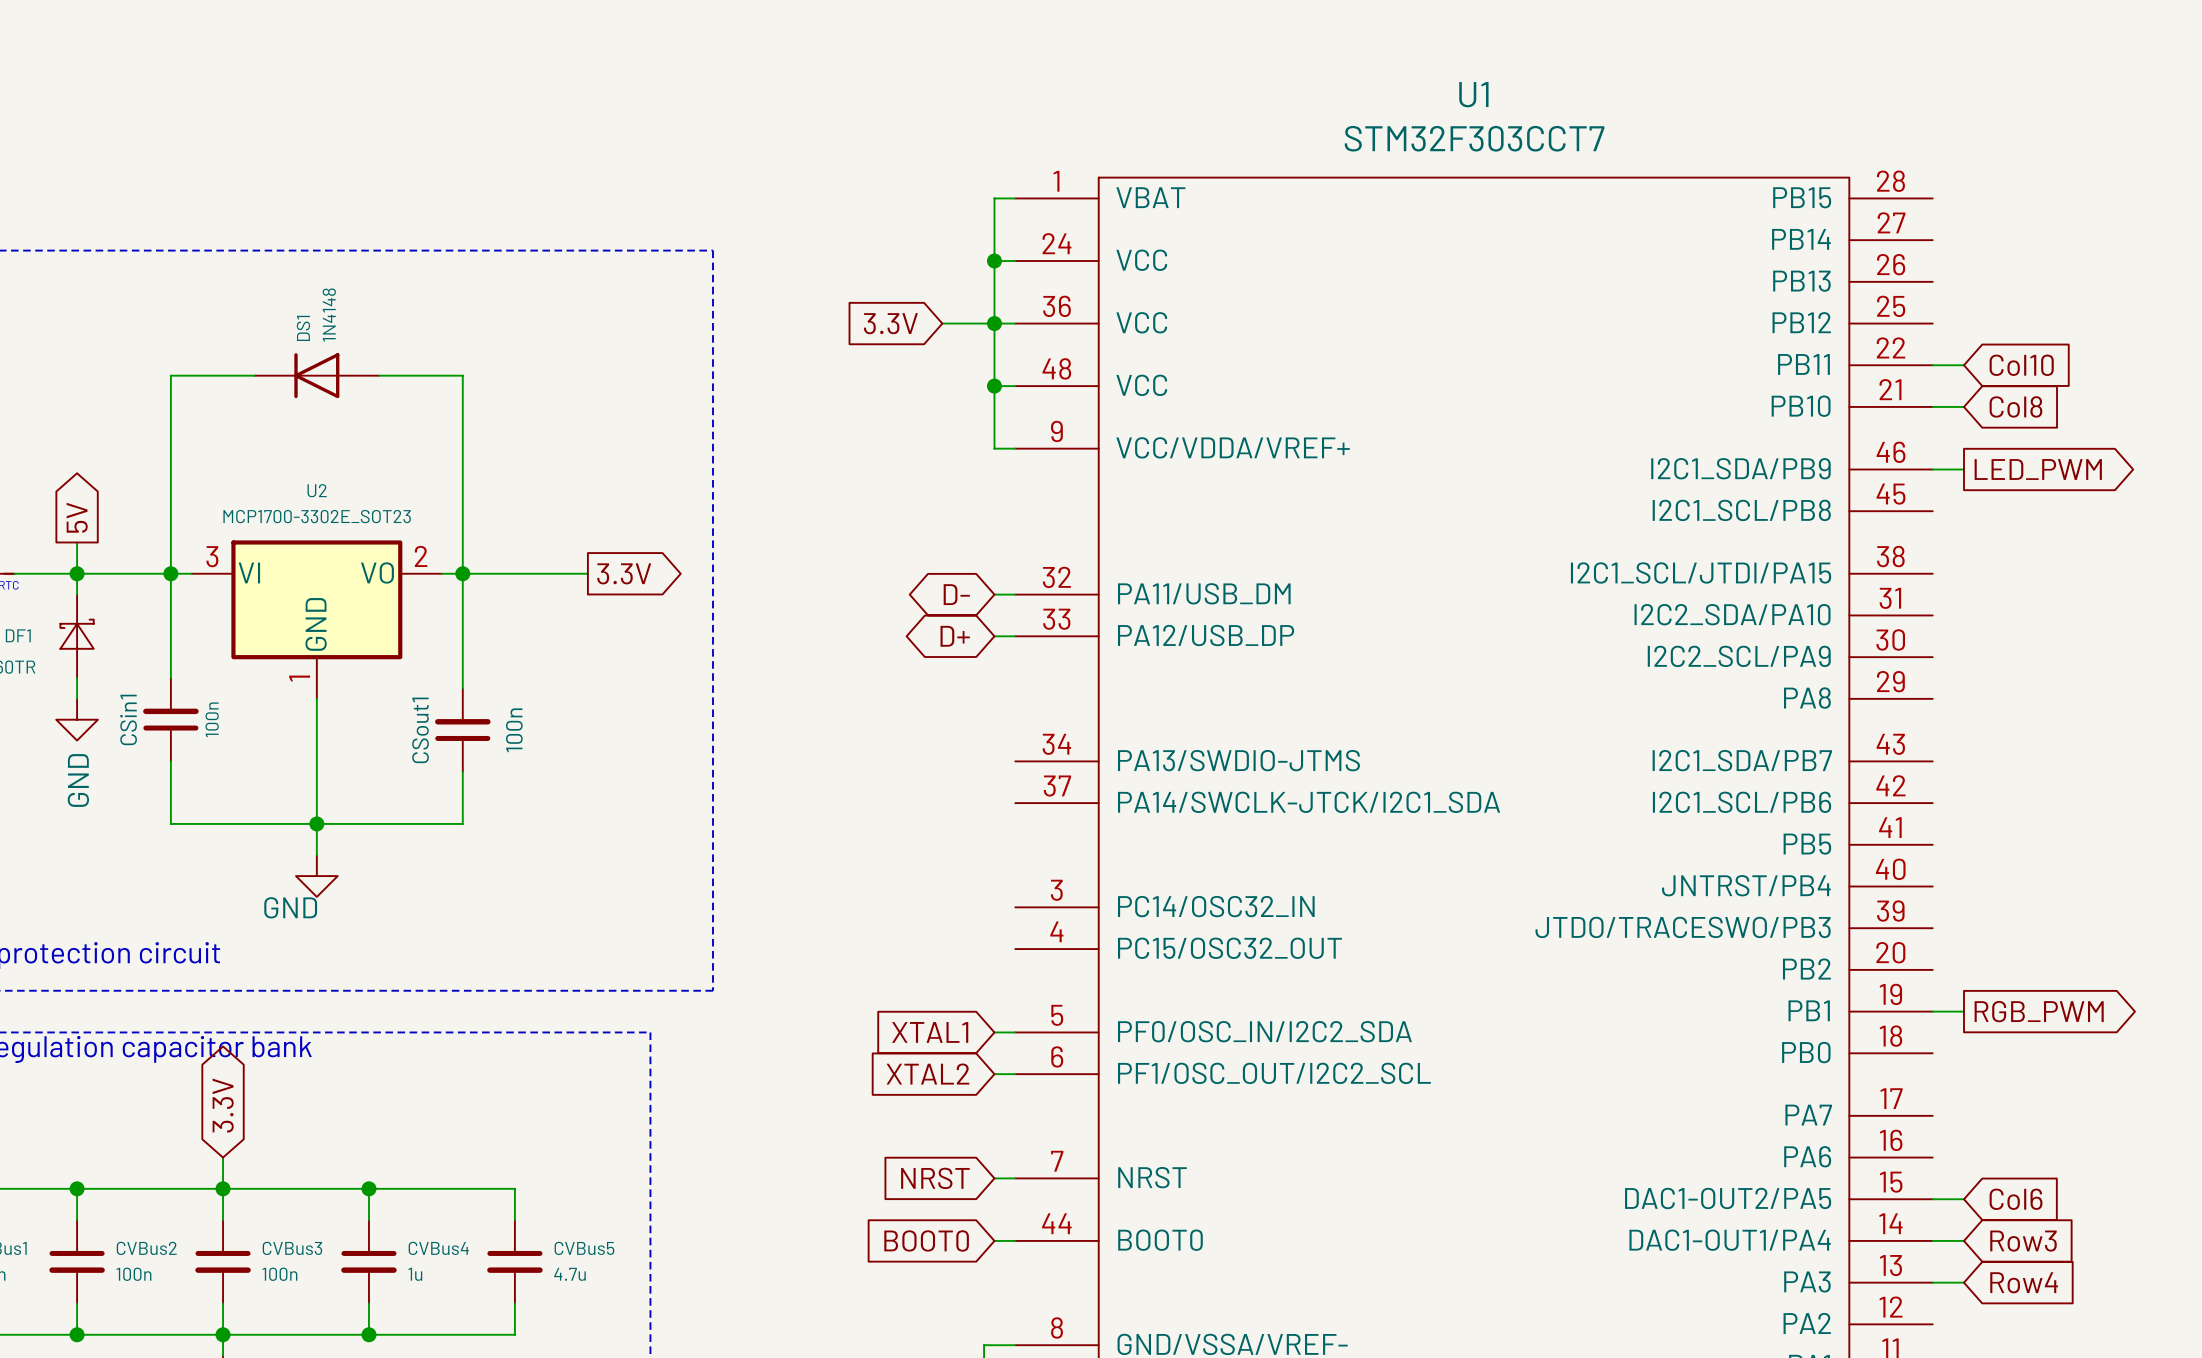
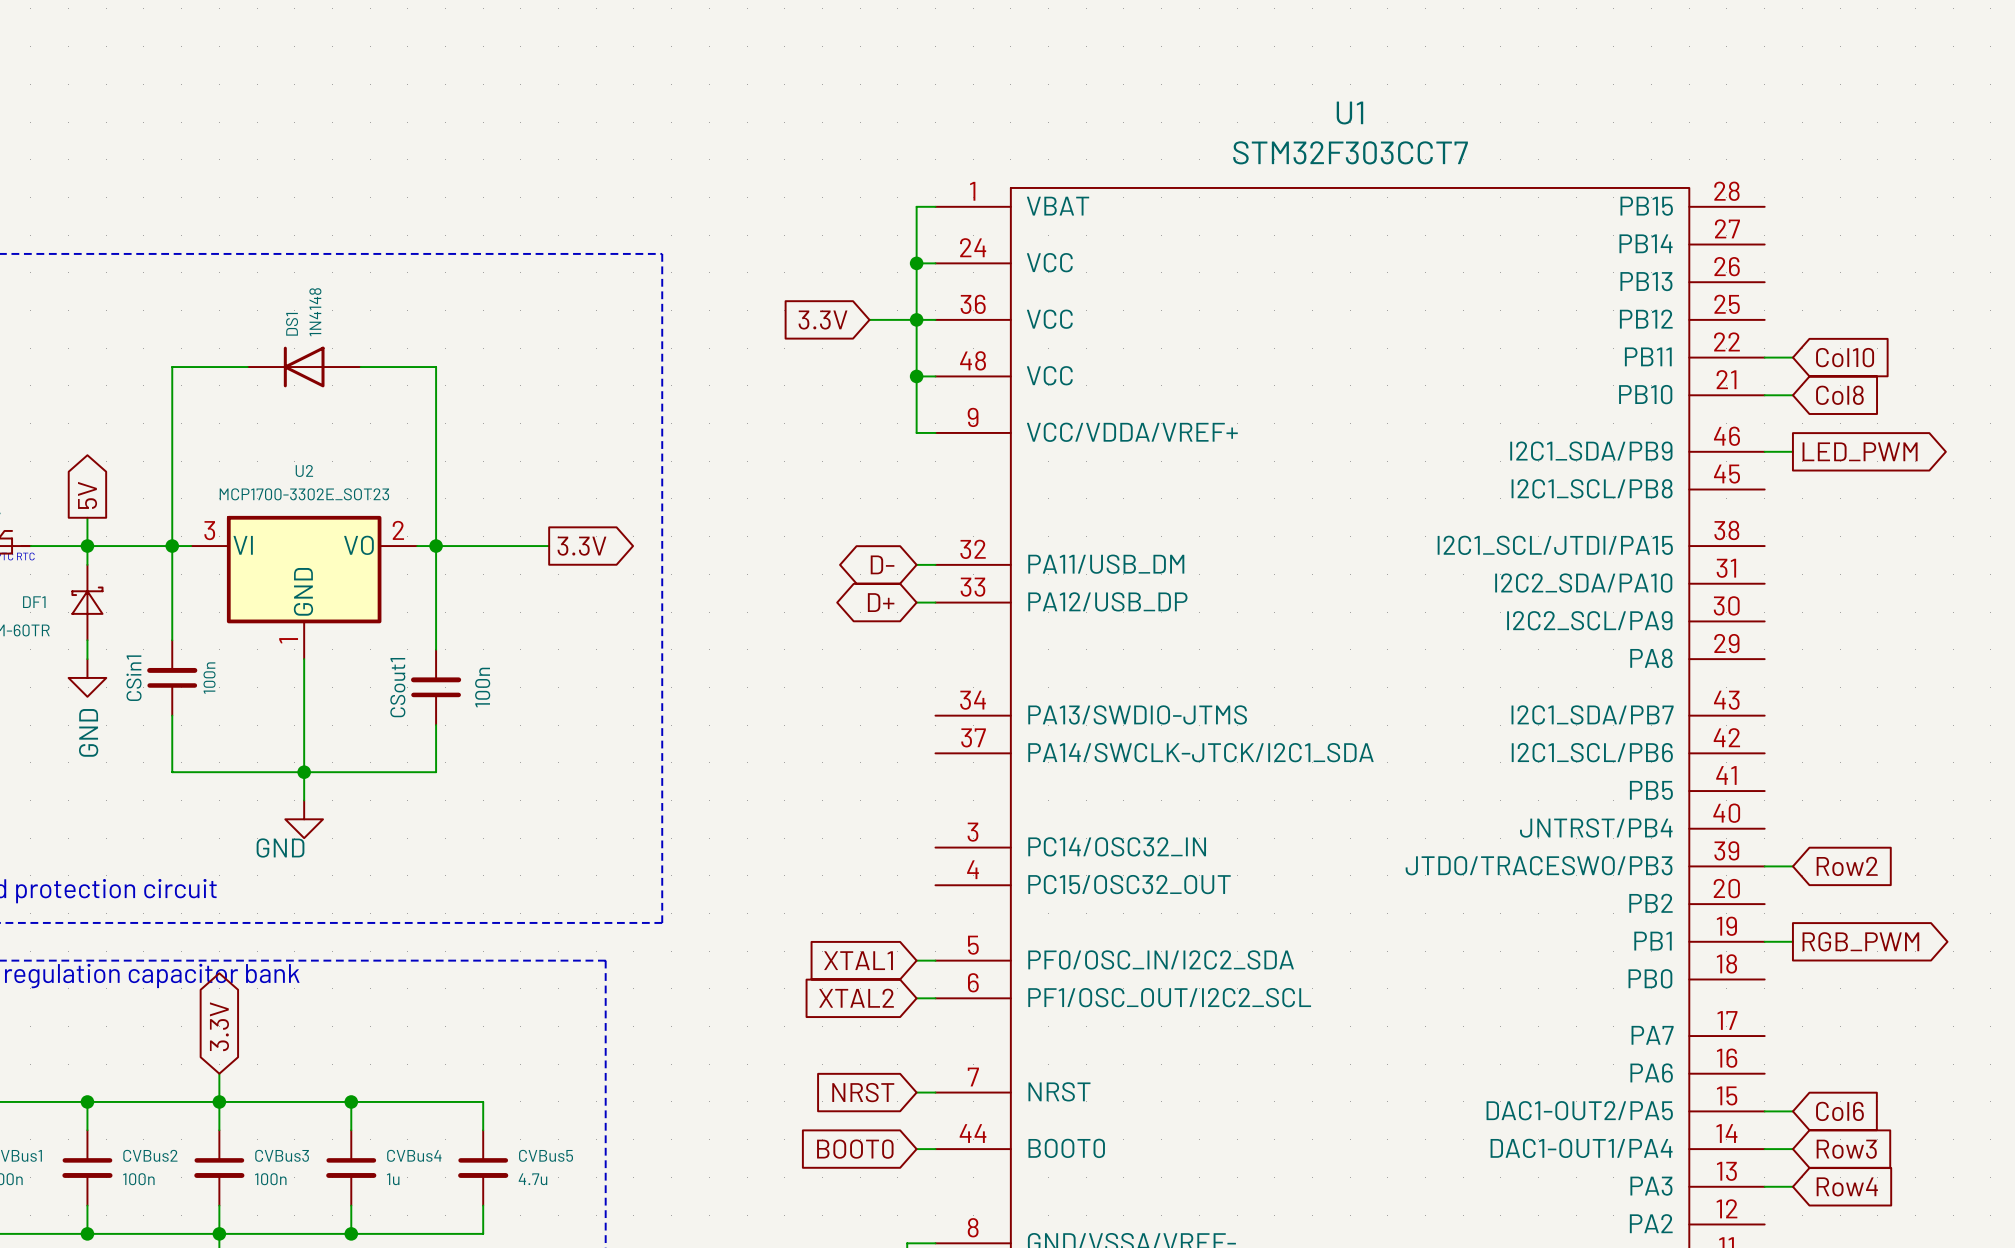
wire: none -> (1764, 866) (1792, 866)
global label: none -> Row2 (1847, 866)

